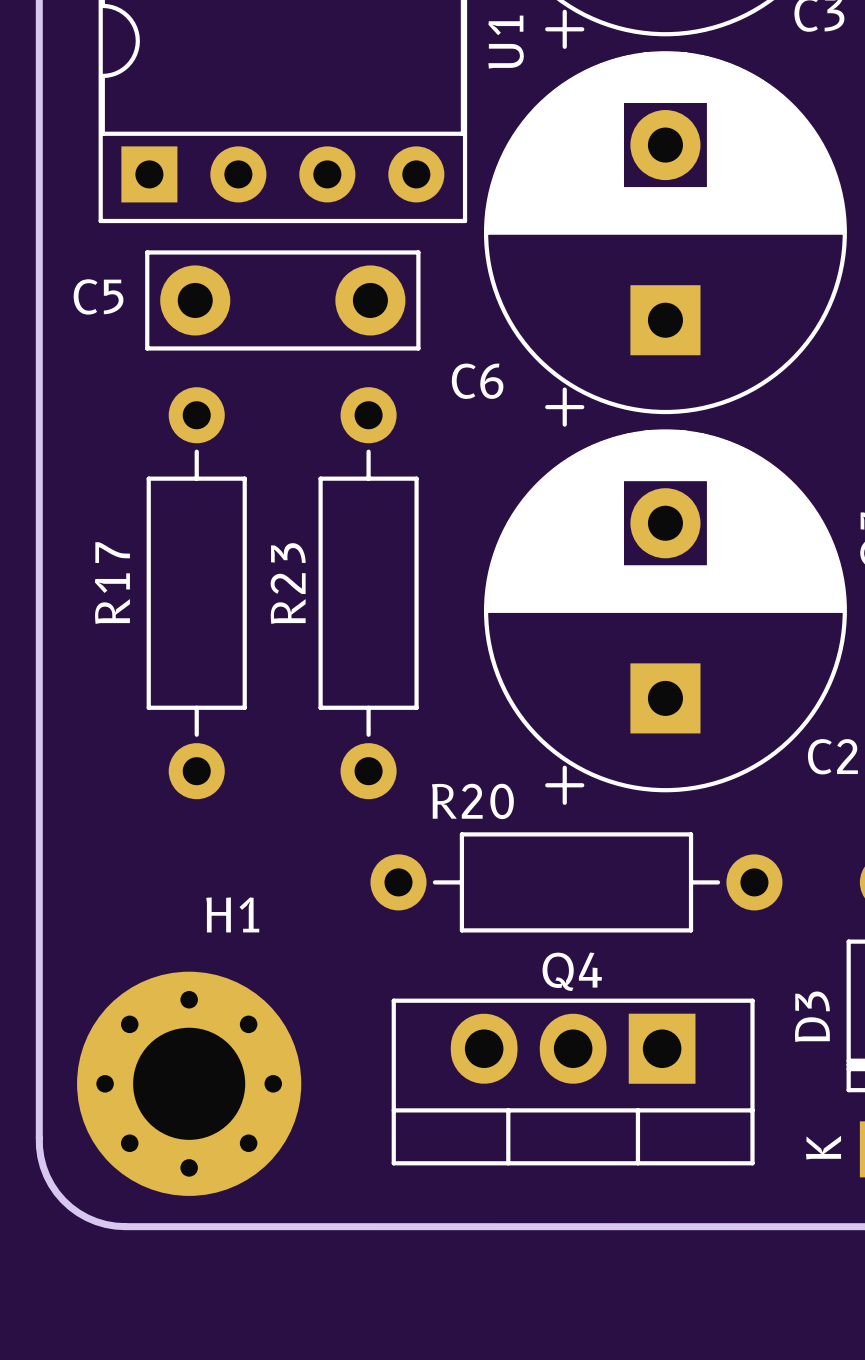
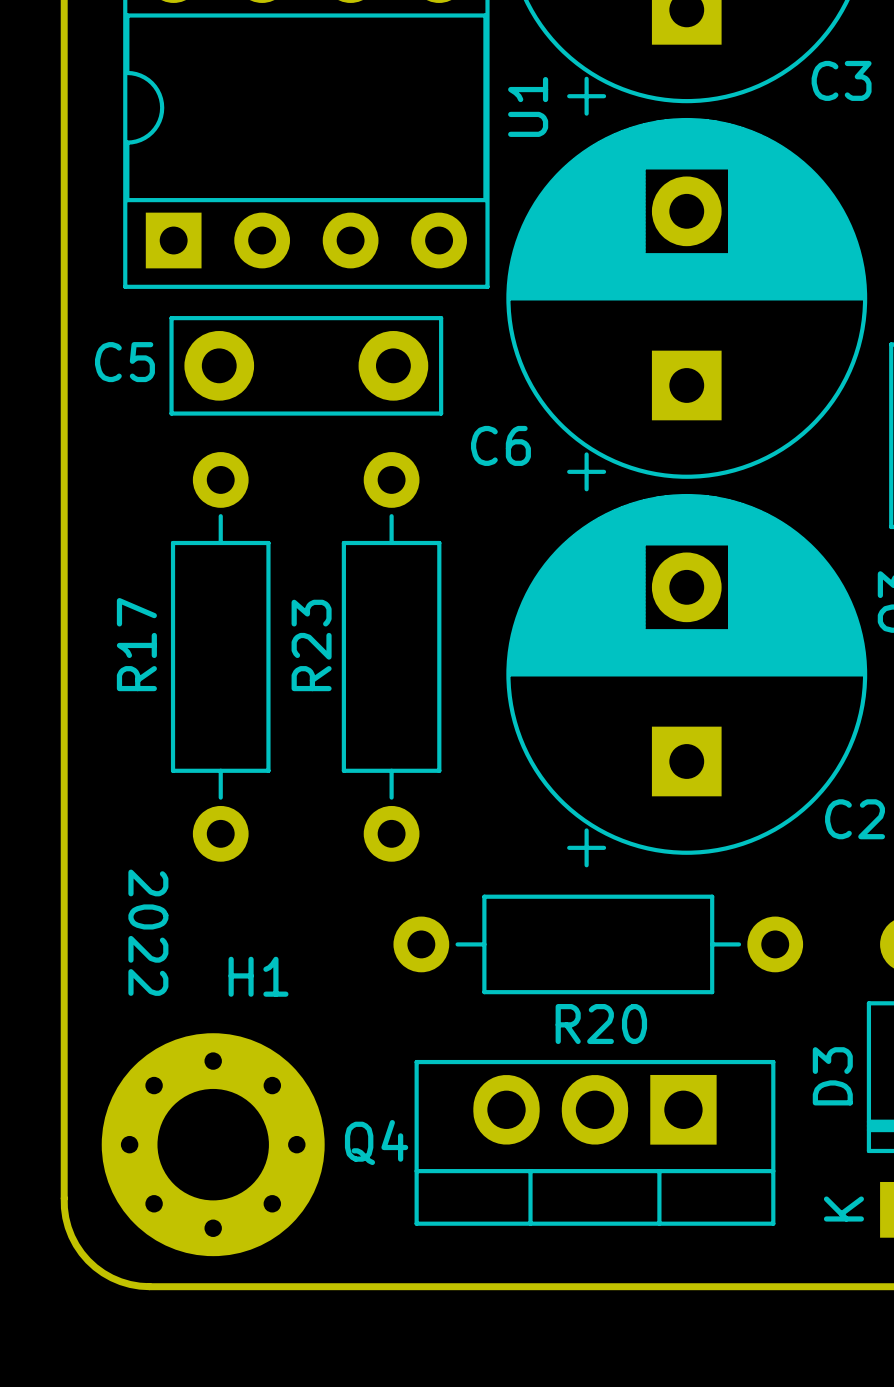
R20 name position: R20 (472, 801) -> R20 (601, 1024)
text: none -> 2022 (148, 932)
Q4 name position: Q4 (572, 971) -> Q4 (376, 1142)

